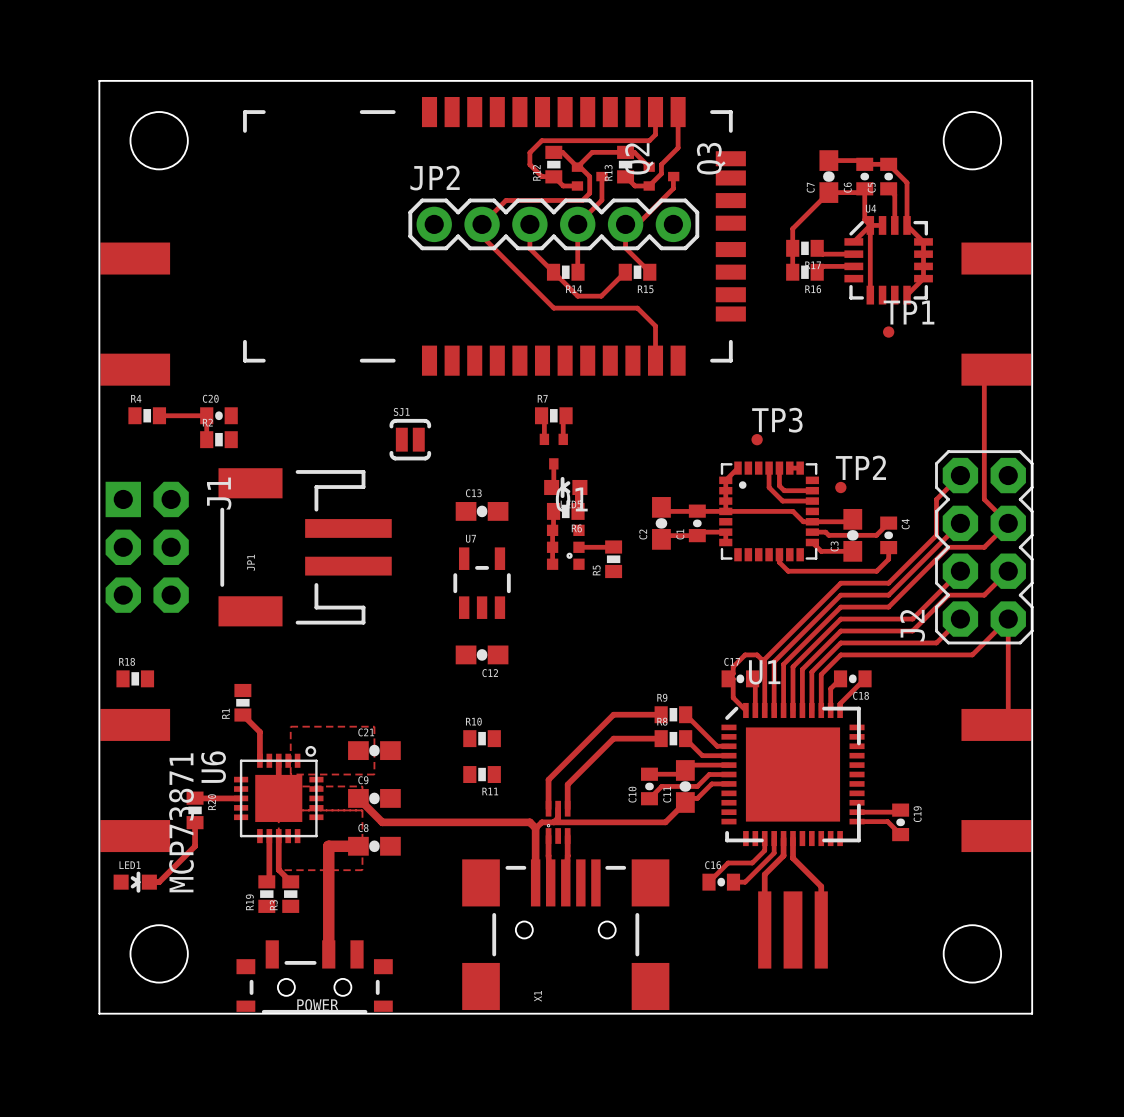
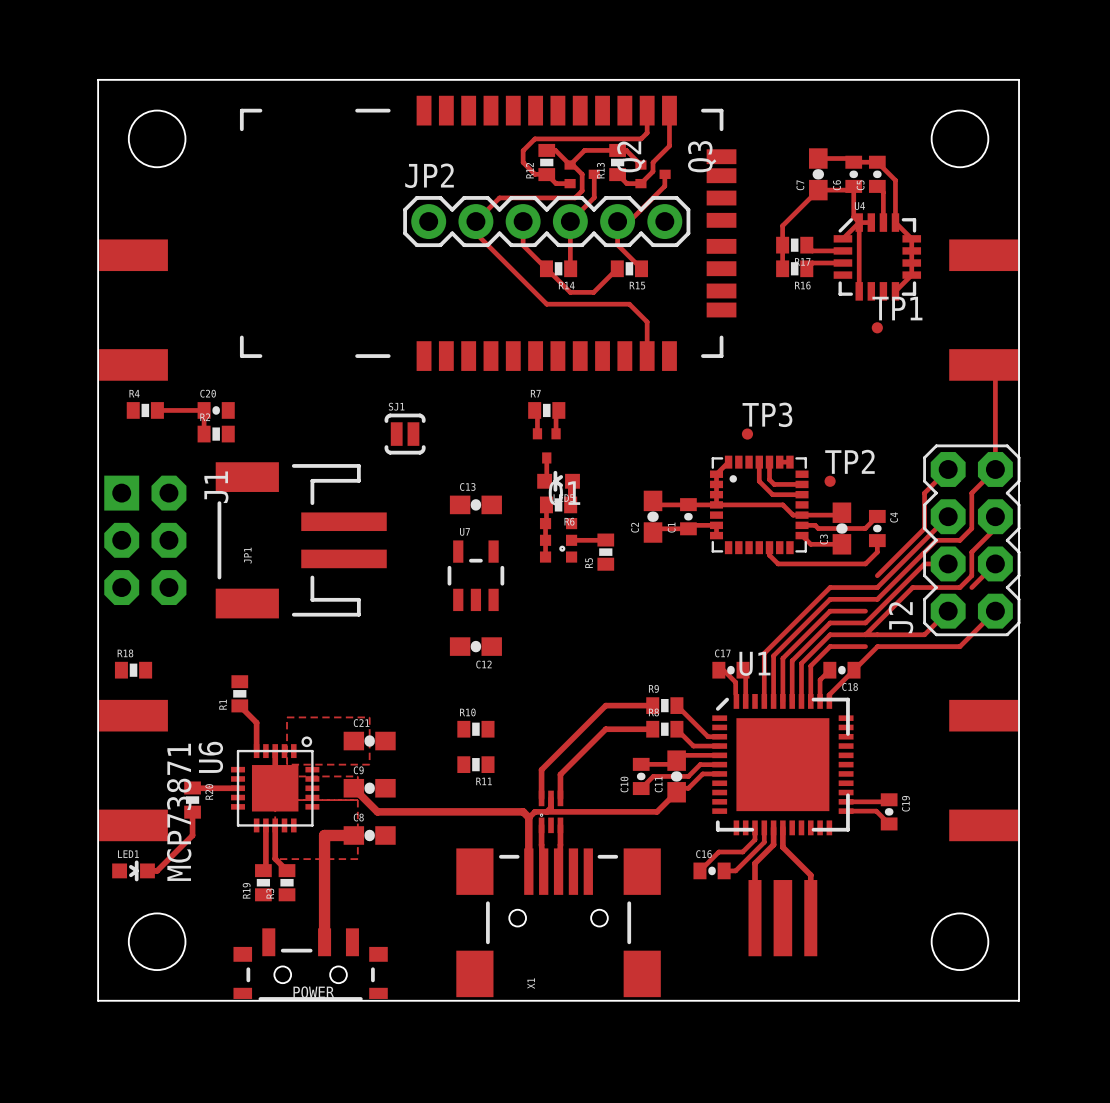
track: (996, 369) (984, 381) (984, 499) (1008, 523) (984, 547) (972, 547) -> (995, 363) (995, 469) (971, 493) (971, 528) (959, 540)
track: (960, 571) (912, 619) (876, 619) -> (948, 563) (924, 563) (865, 622)
track: (888, 583) (840, 583) (763, 660) -> none
track: (948, 595) (912, 631) (876, 631) -> (936, 587) (912, 587) (865, 634)
track: (972, 595) (984, 595) -> (959, 587) (971, 575) (971, 552) (995, 528) (995, 516)
track: (1008, 631) (1008, 712) (996, 724) -> none
track: (876, 654) (888, 654) -> (854, 670) (877, 646)
track: none -> (723, 670) (735, 682) (735, 693)
track: (745, 710) (733, 697) (733, 678) (728, 678) (733, 673) (733, 666) (745, 654) (757, 654) (764, 662) (764, 710) -> none

